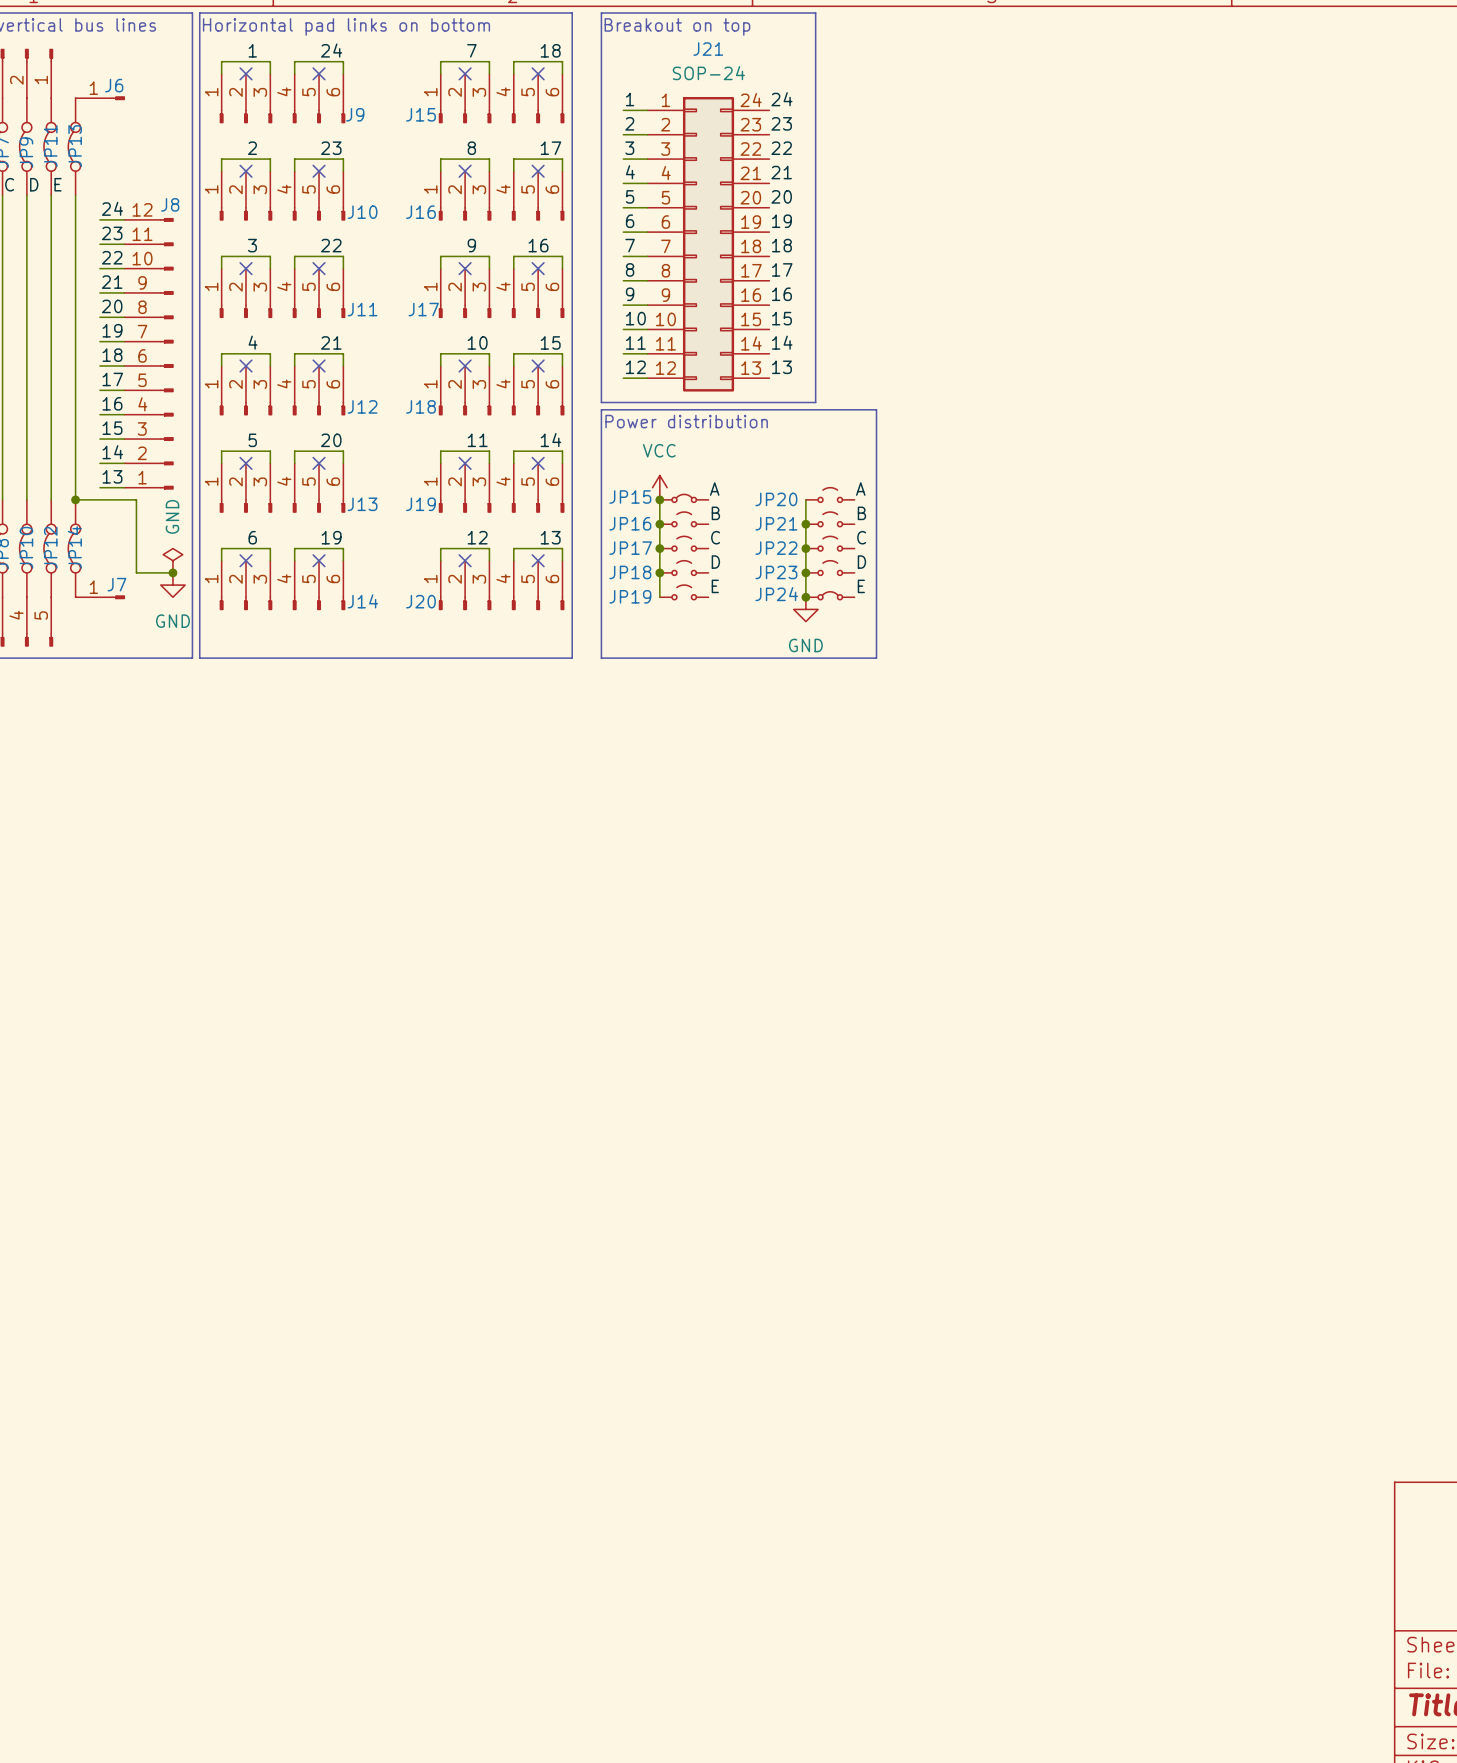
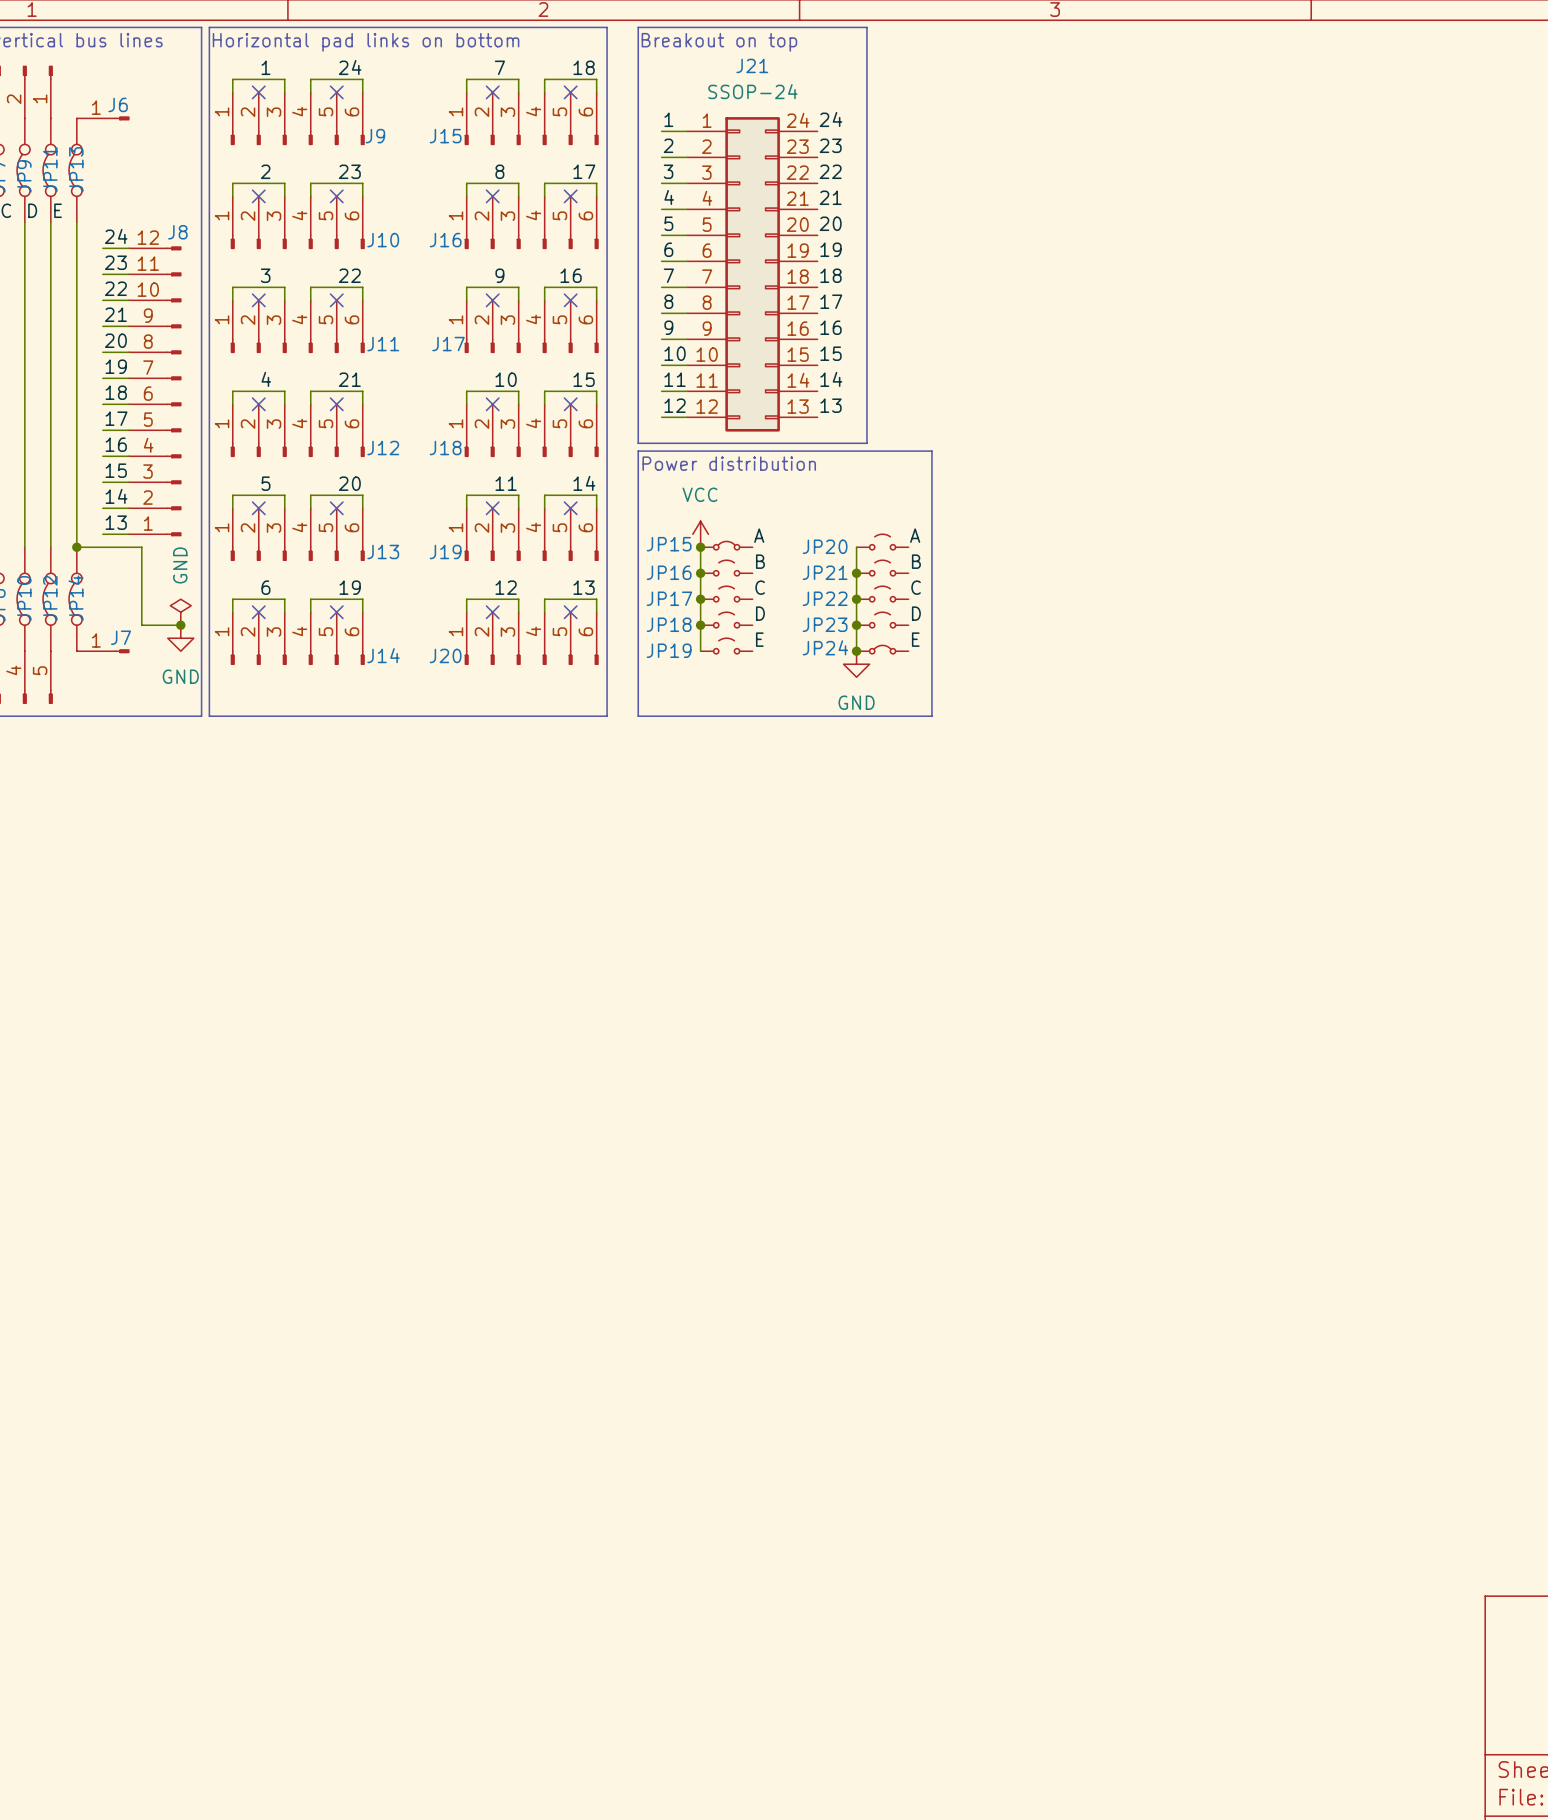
J21 value: SOP-24 (708, 73) -> SSOP-24 (752, 91)

